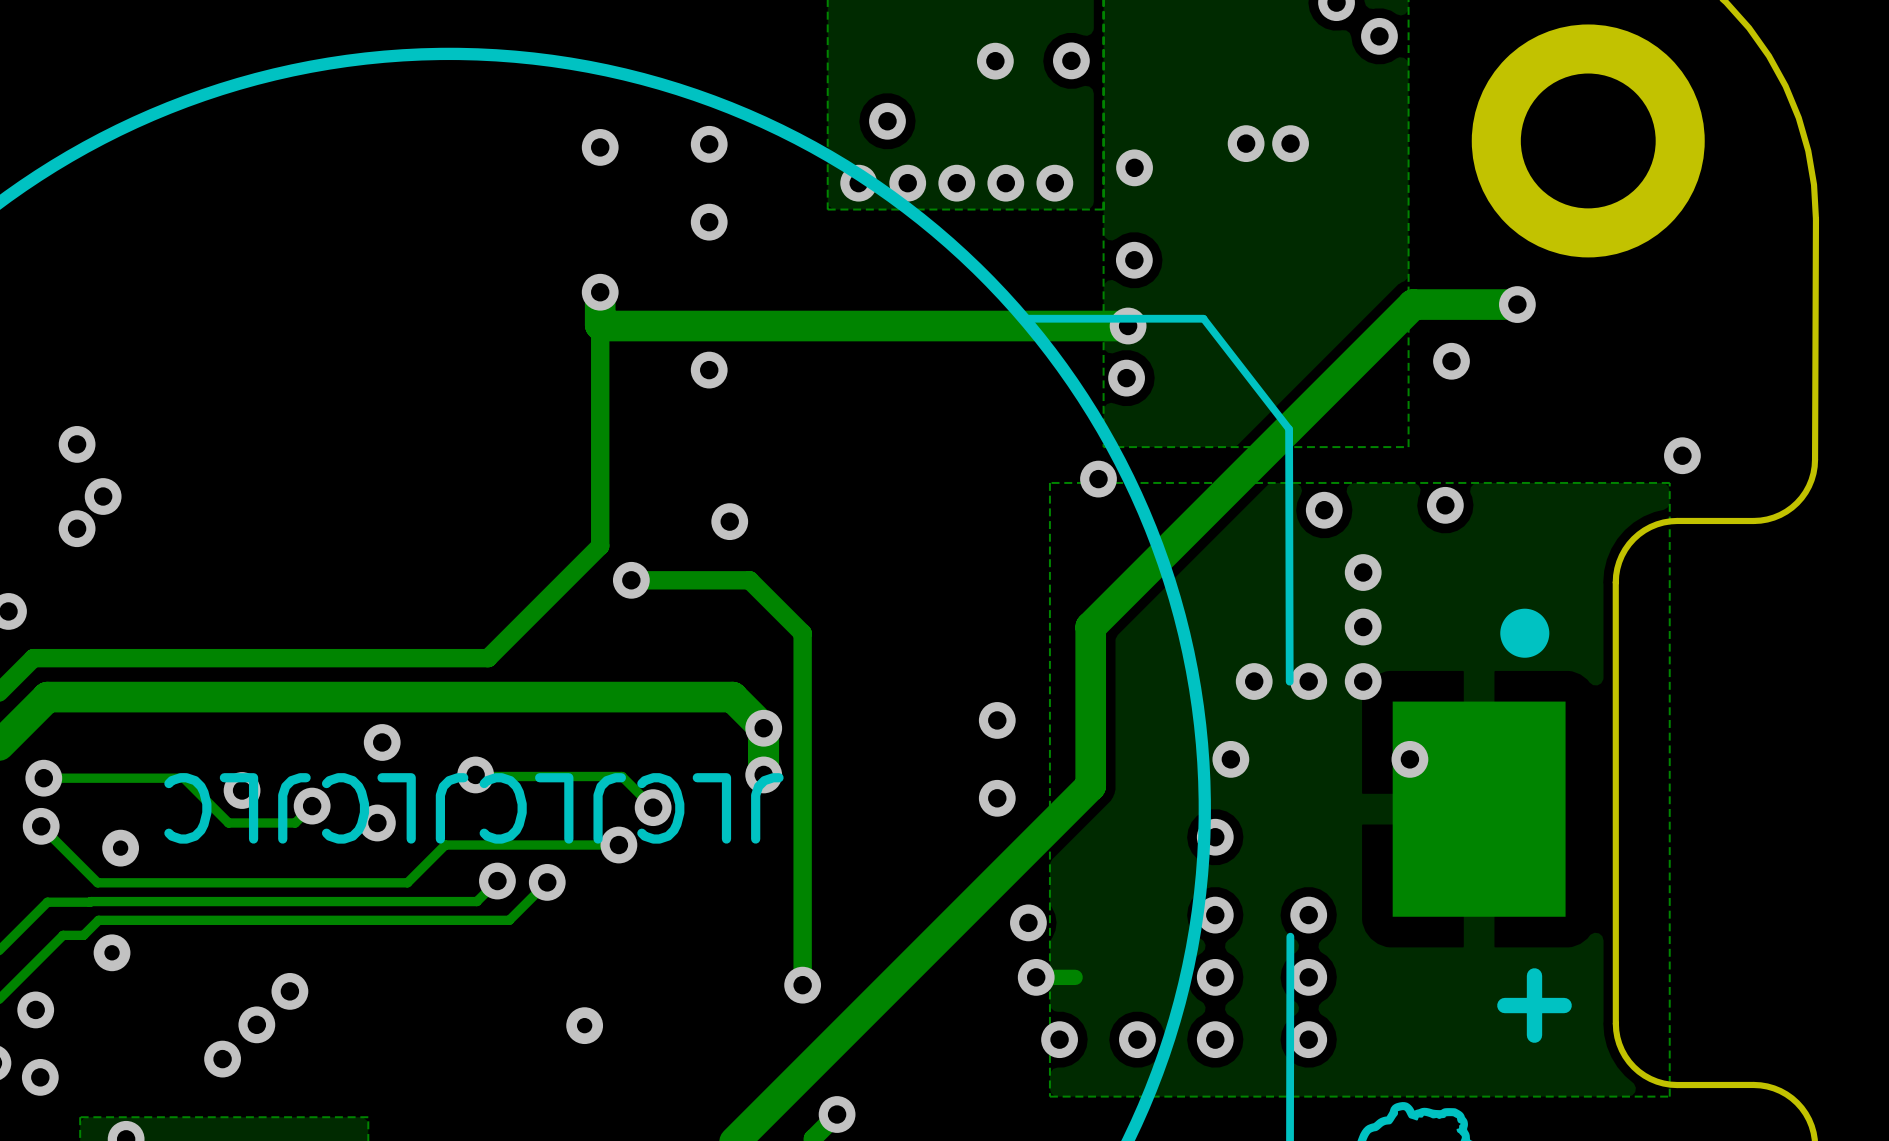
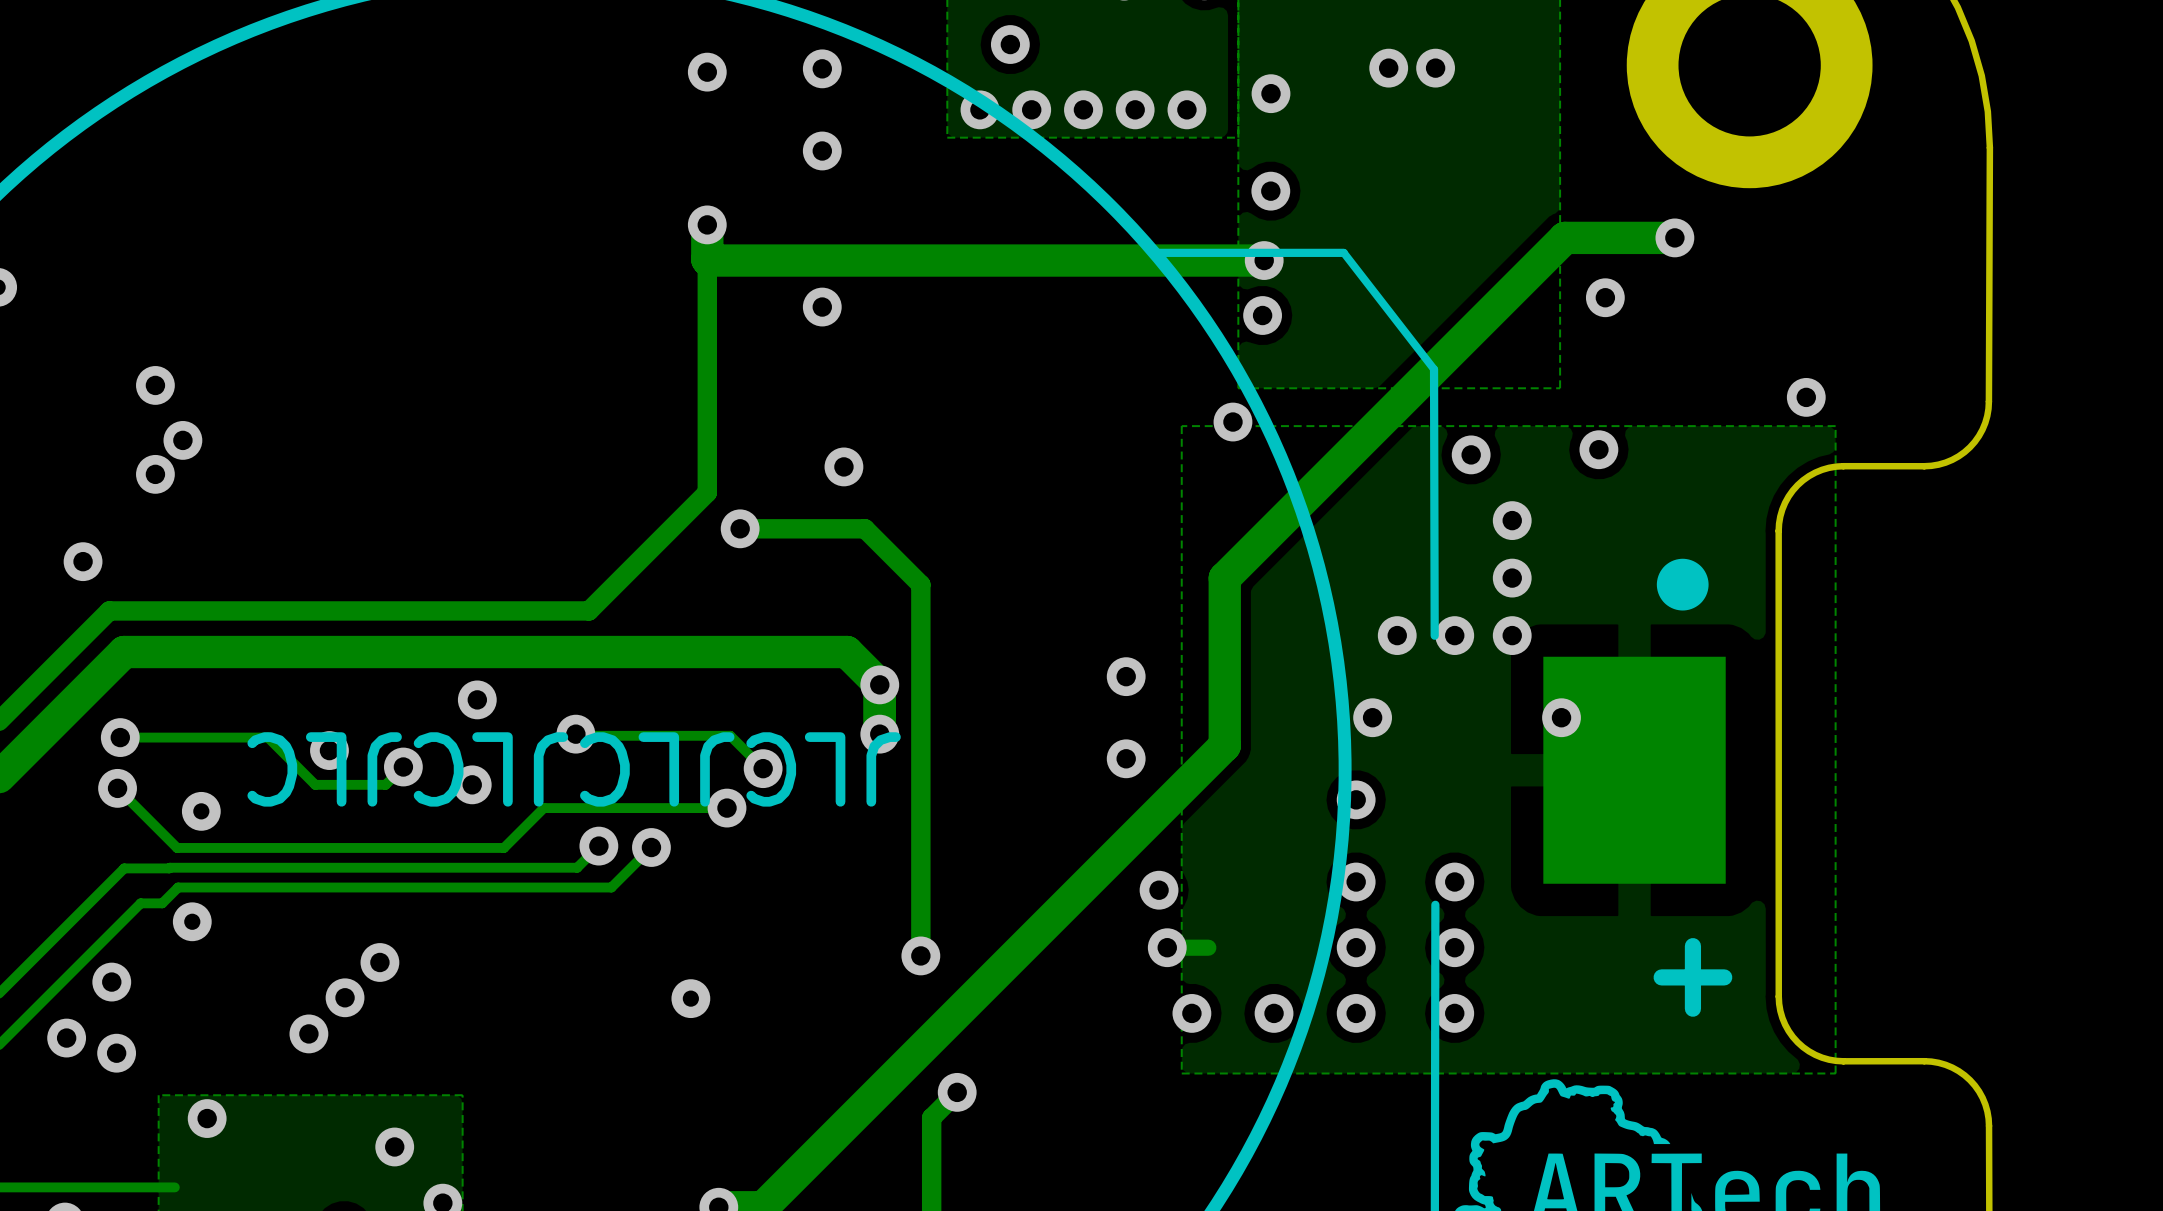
via position: (1682, 455) -> (1806, 397)

